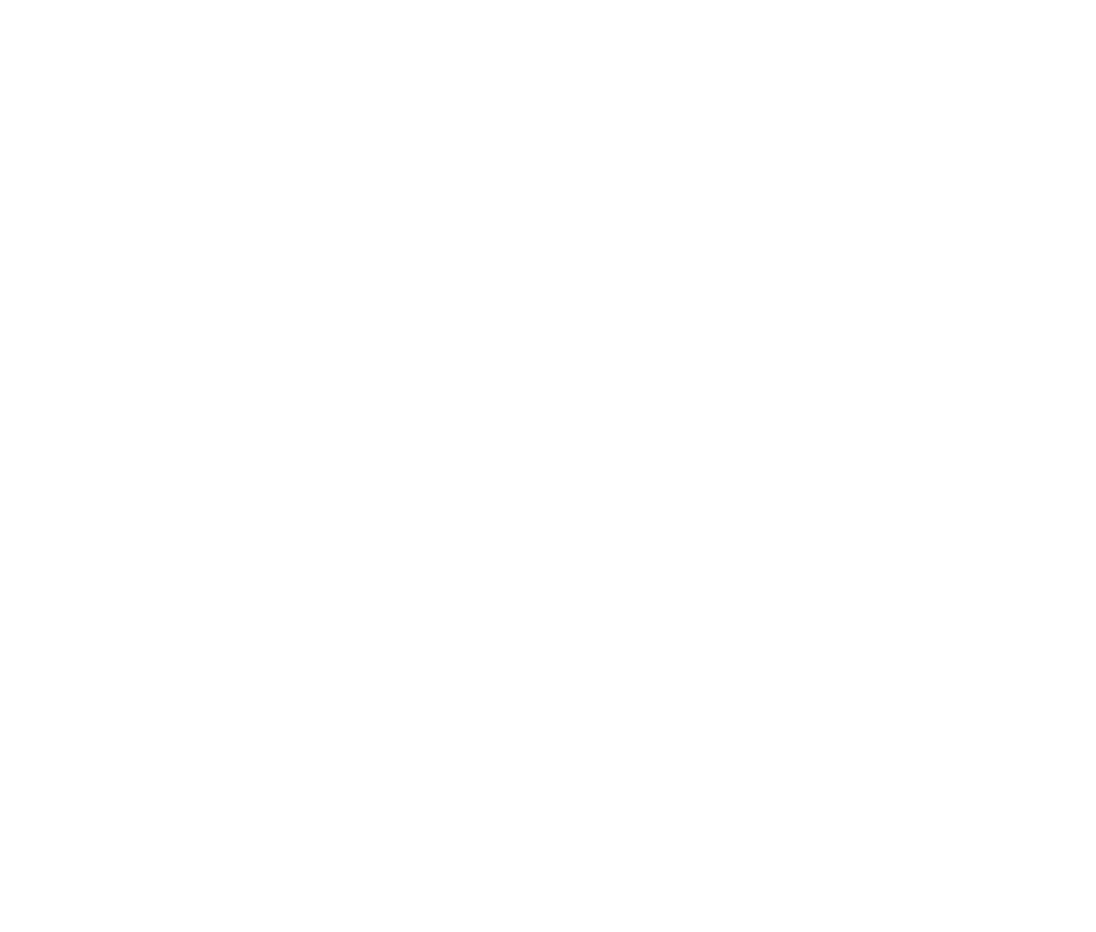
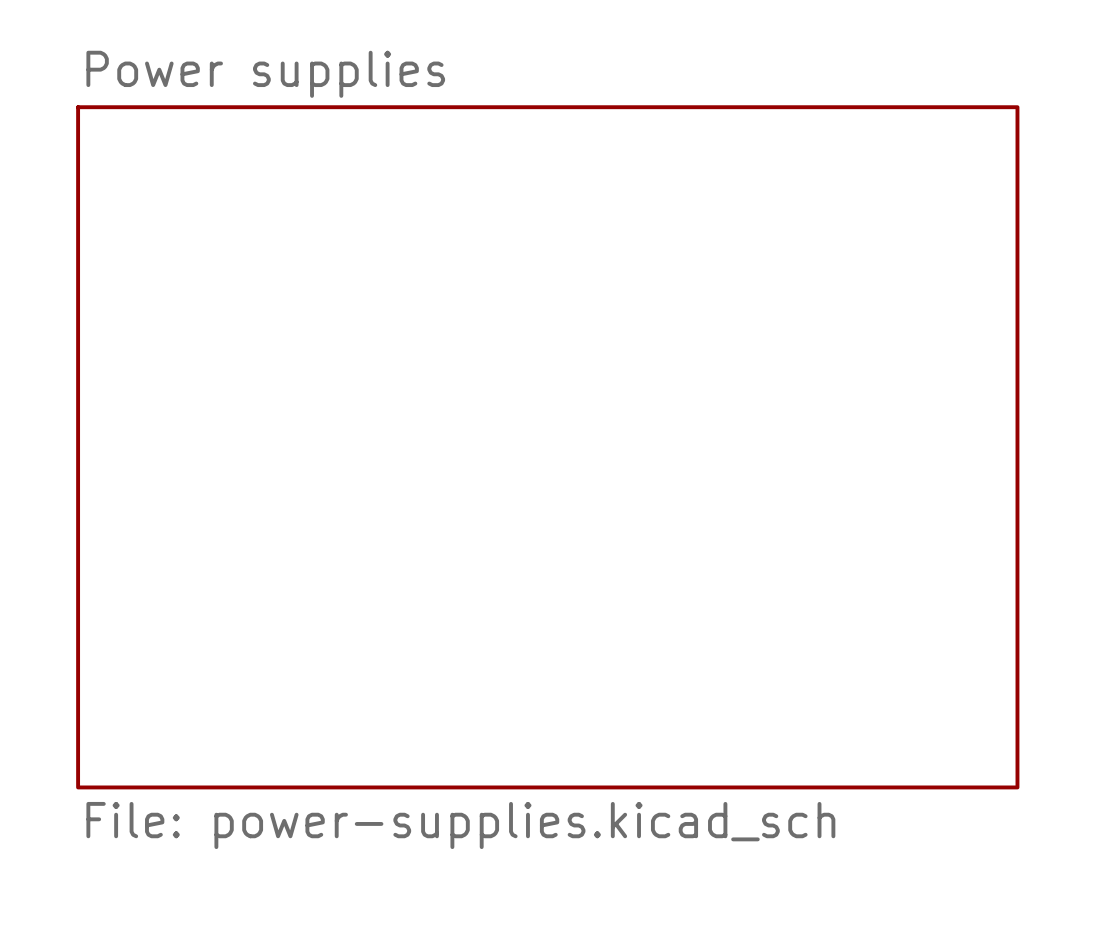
sheet Power supplies: none -> File: power-supplies.kicad_sch (547, 447)

